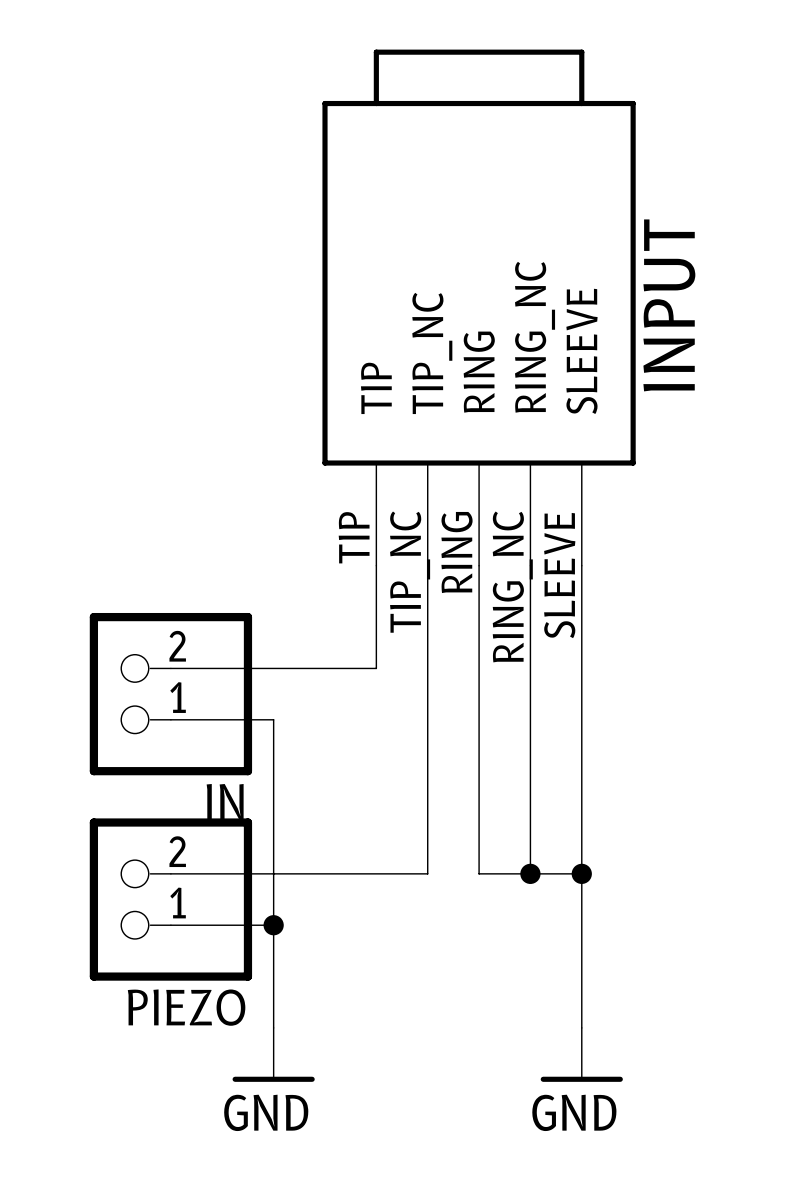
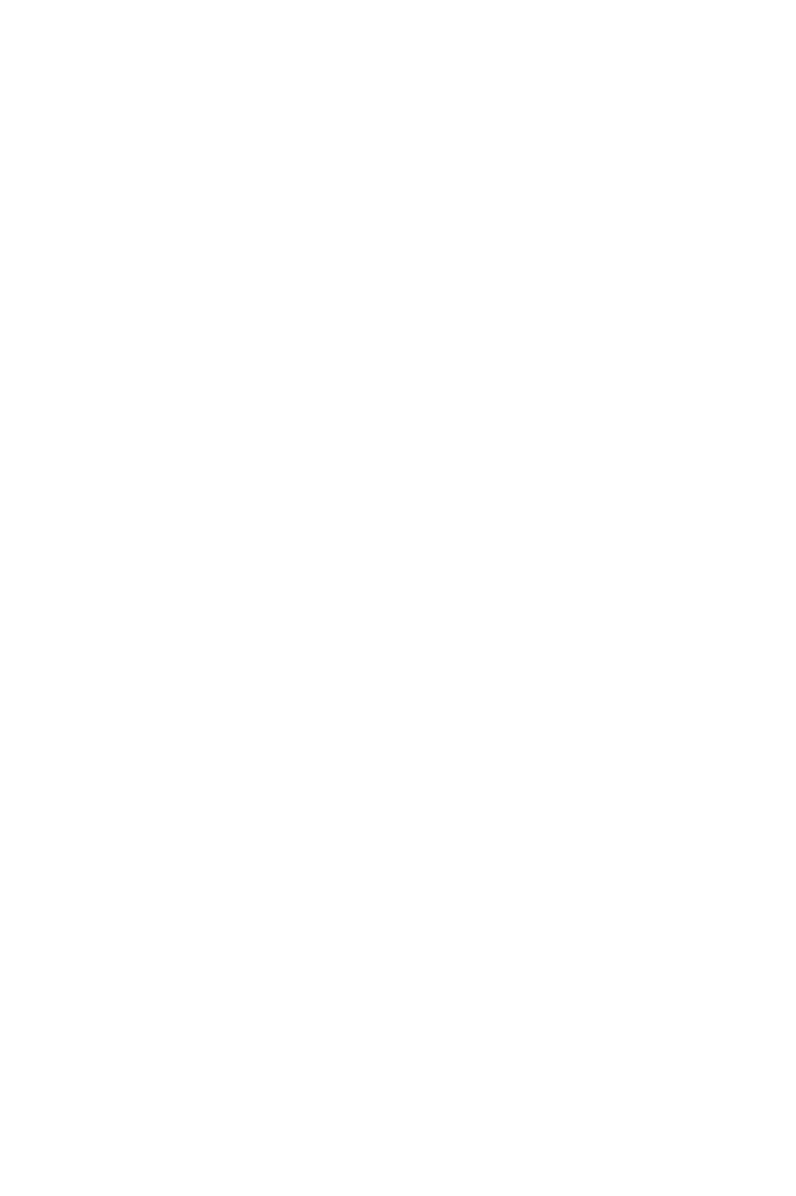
INPUT: (479, 307) -> none
wire: (376, 565) (376, 668) (170, 668) -> none
wire: (427, 565) (427, 873) (170, 873) -> none
wire: (479, 565) (479, 873) (581, 873) -> none
wire: (530, 565) (530, 873) -> none
wire: (581, 565) (581, 1027) -> none
IN: (170, 694) -> none
wire: (170, 719) (273, 719) (273, 1027) -> none
junction: (530, 873) -> none
junction: (581, 873) -> none
PIEZO: (170, 899) -> none
wire: (170, 925) (273, 925) -> none
junction: (273, 925) -> none
power symbol: GND (273, 1054) -> none
power symbol: GND (581, 1054) -> none

